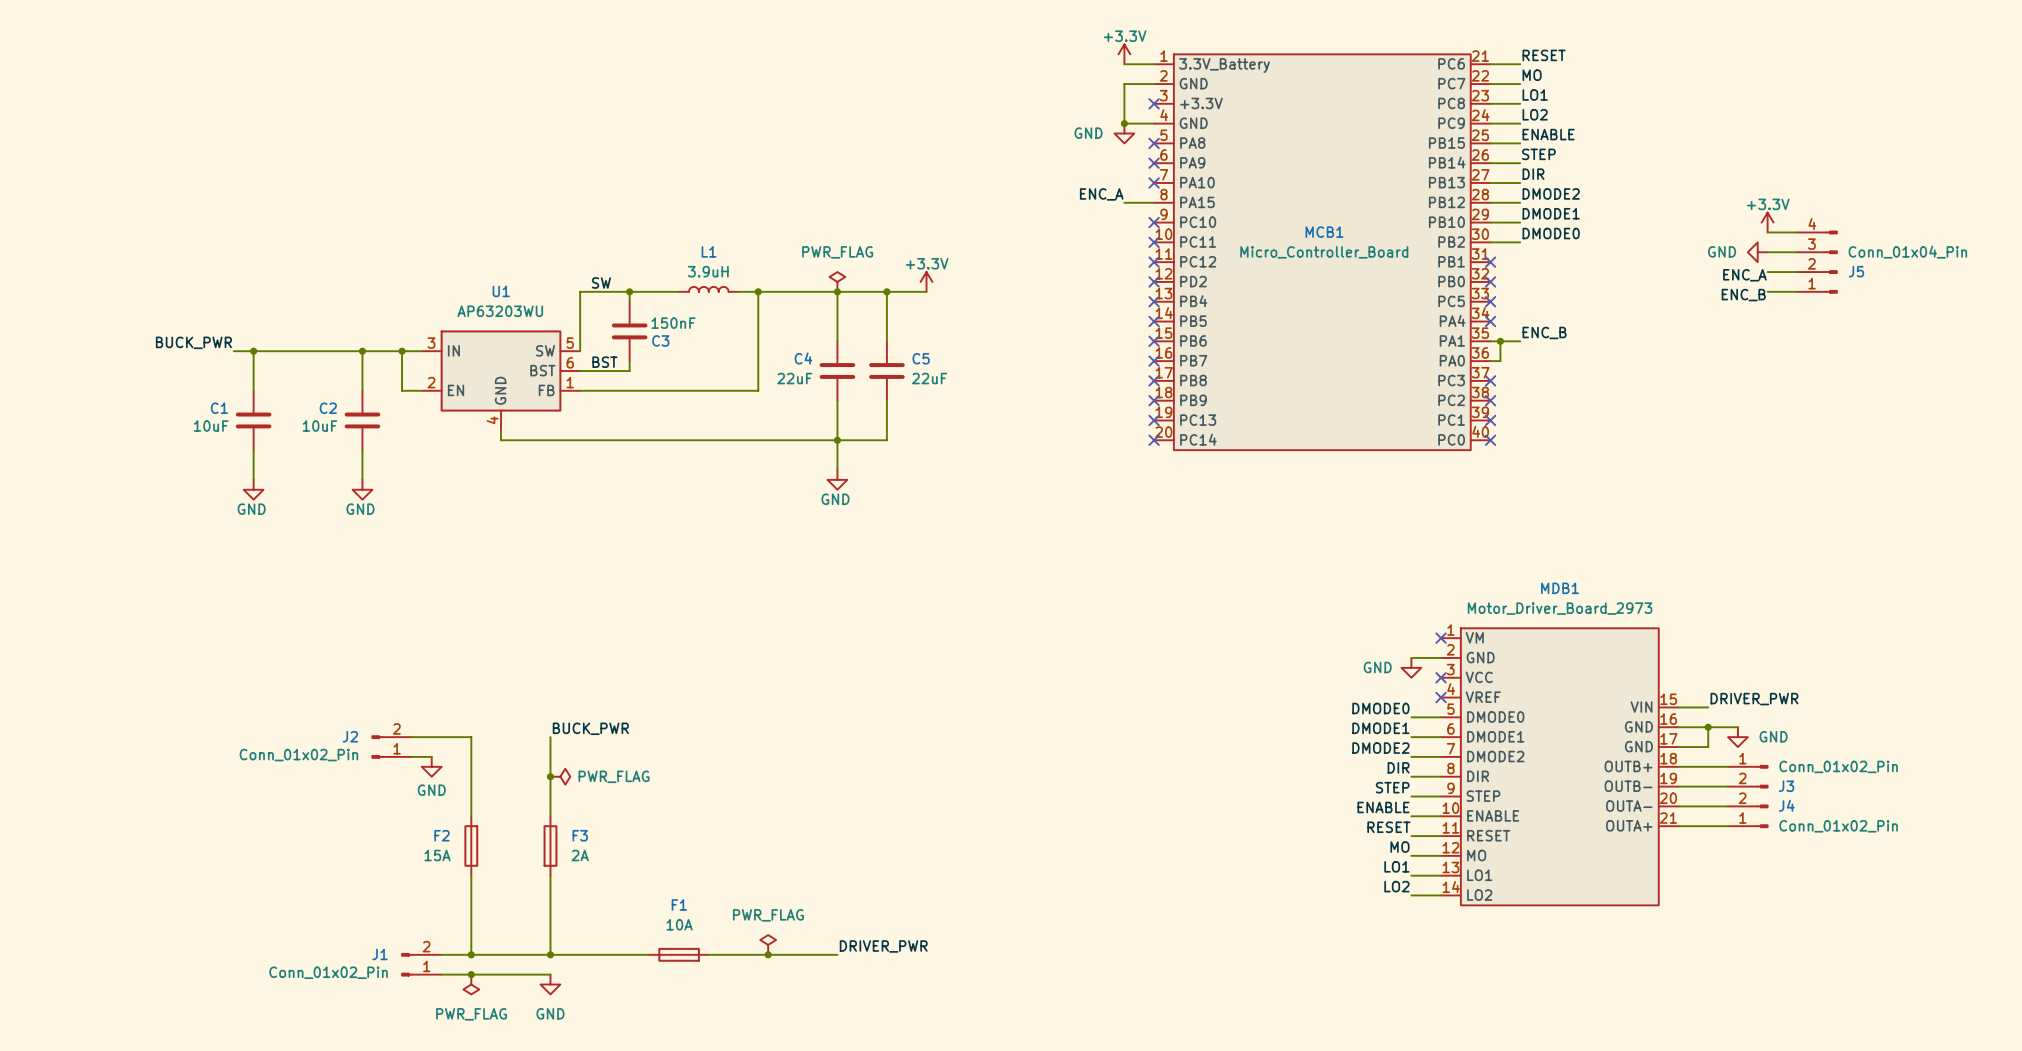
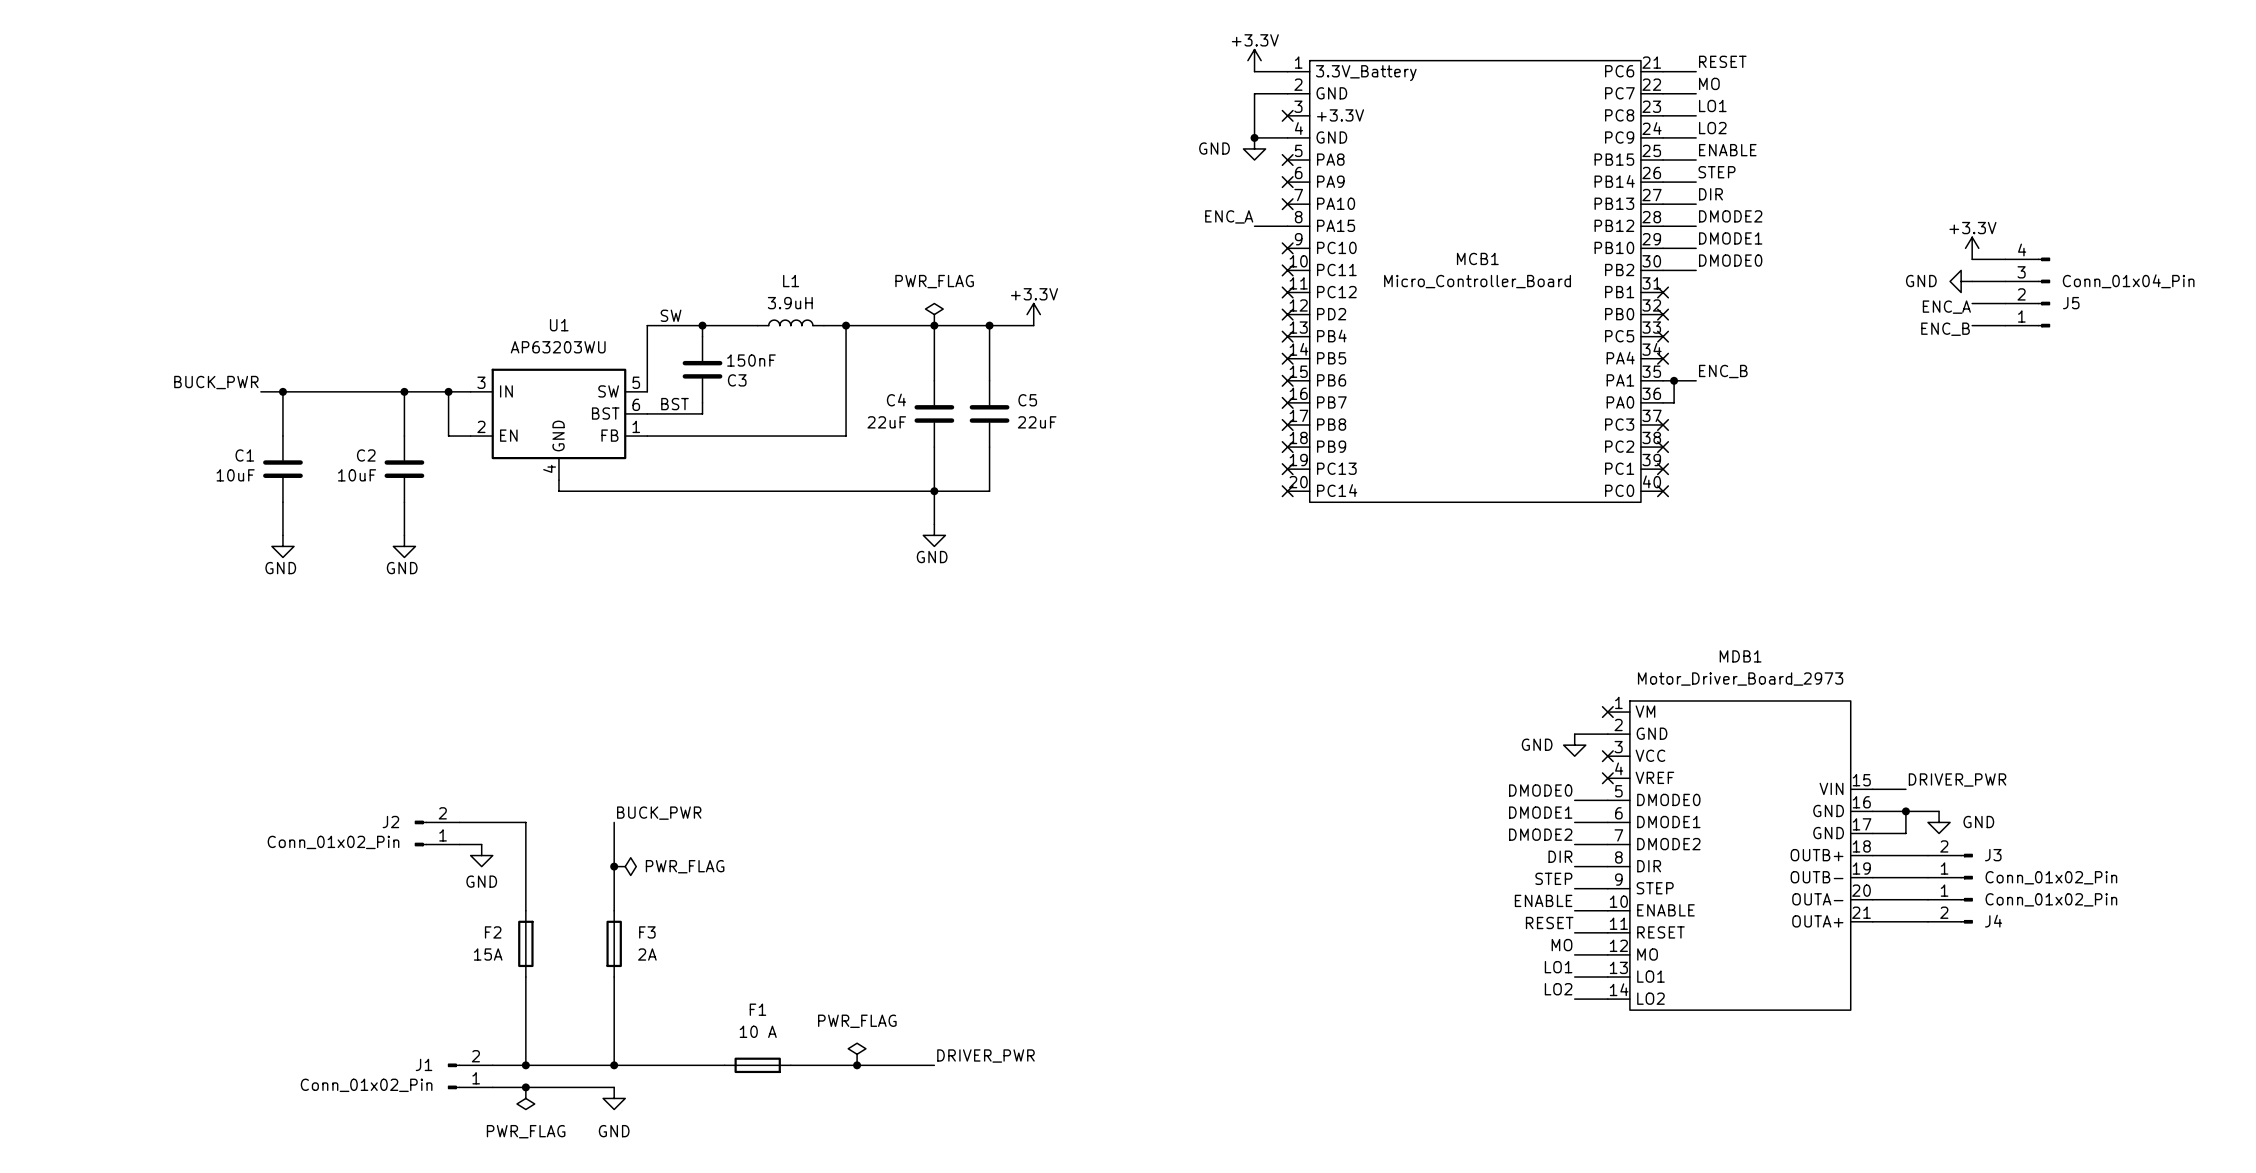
J3 flip: as is (1762, 776) -> up-down (1966, 866)
J4 flip: as is (1762, 816) -> up-down (1966, 910)
F1 value: 10A (679, 924) -> 10 A (758, 1031)

